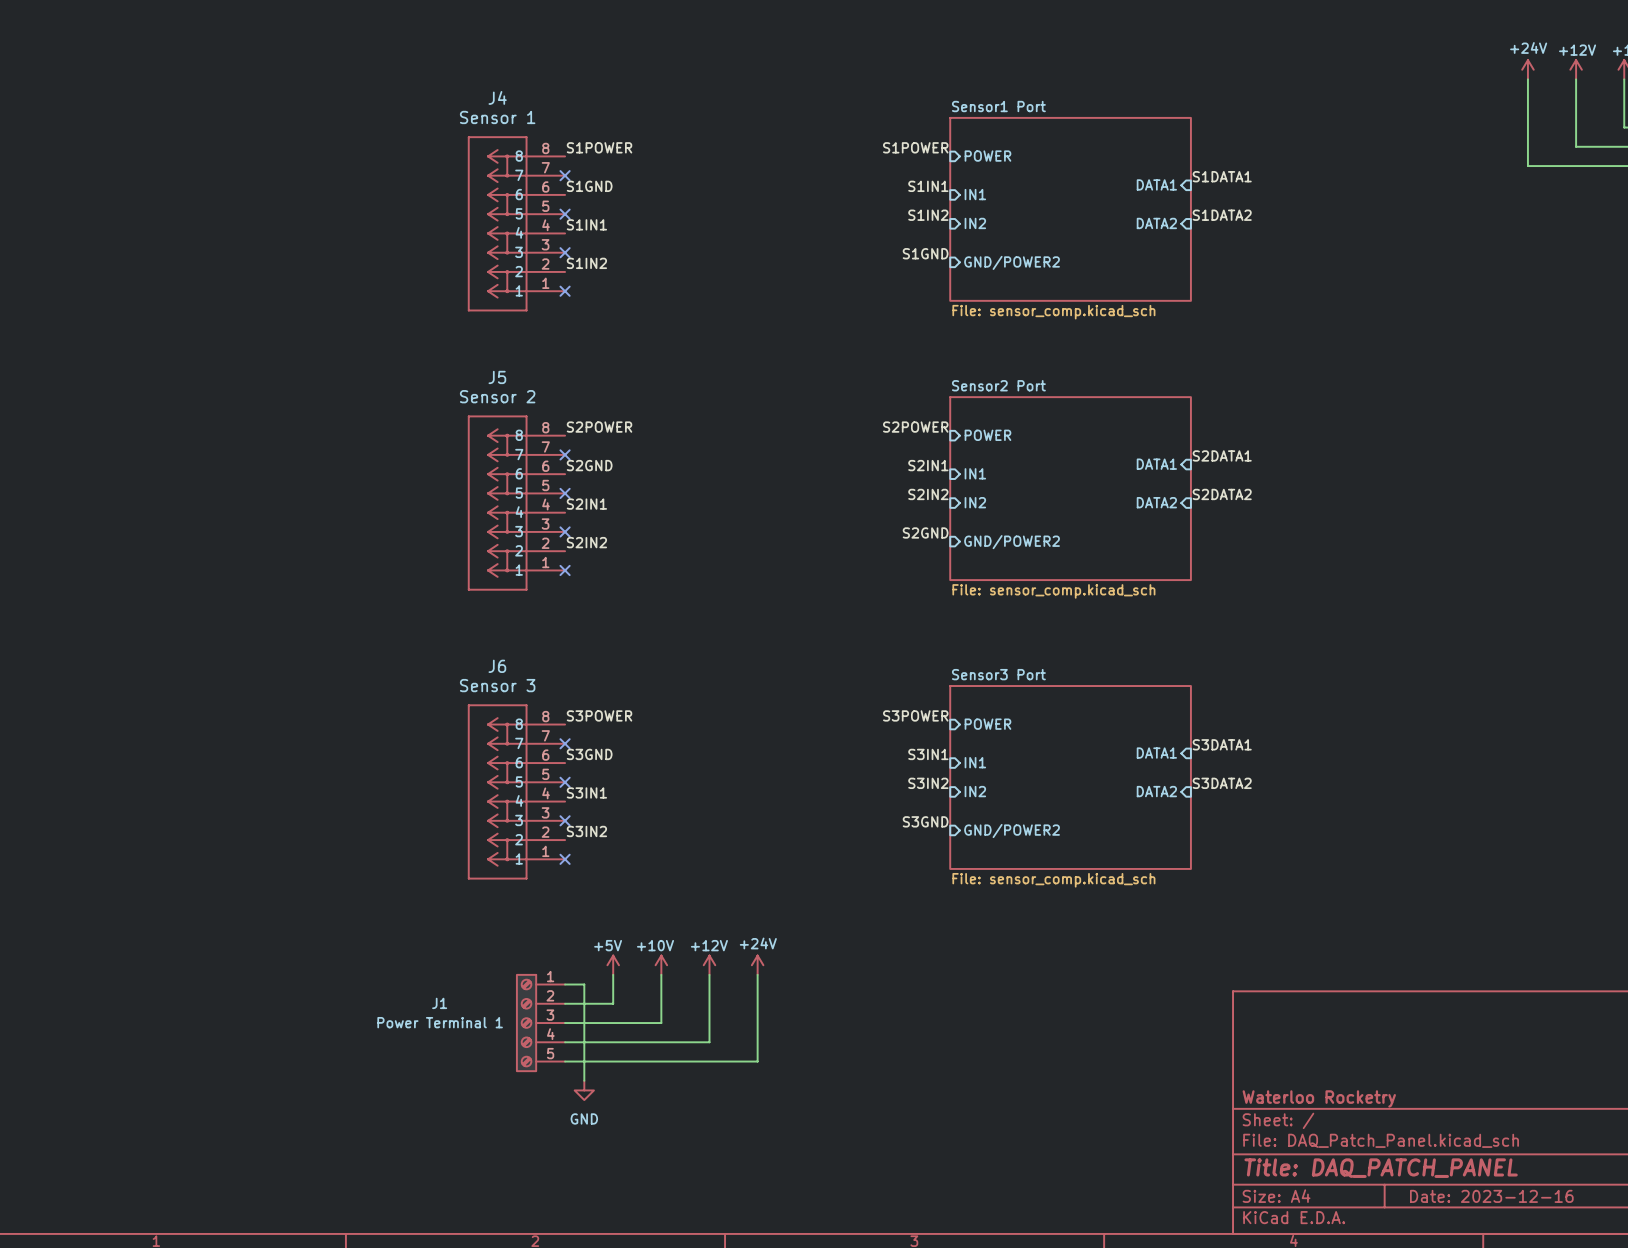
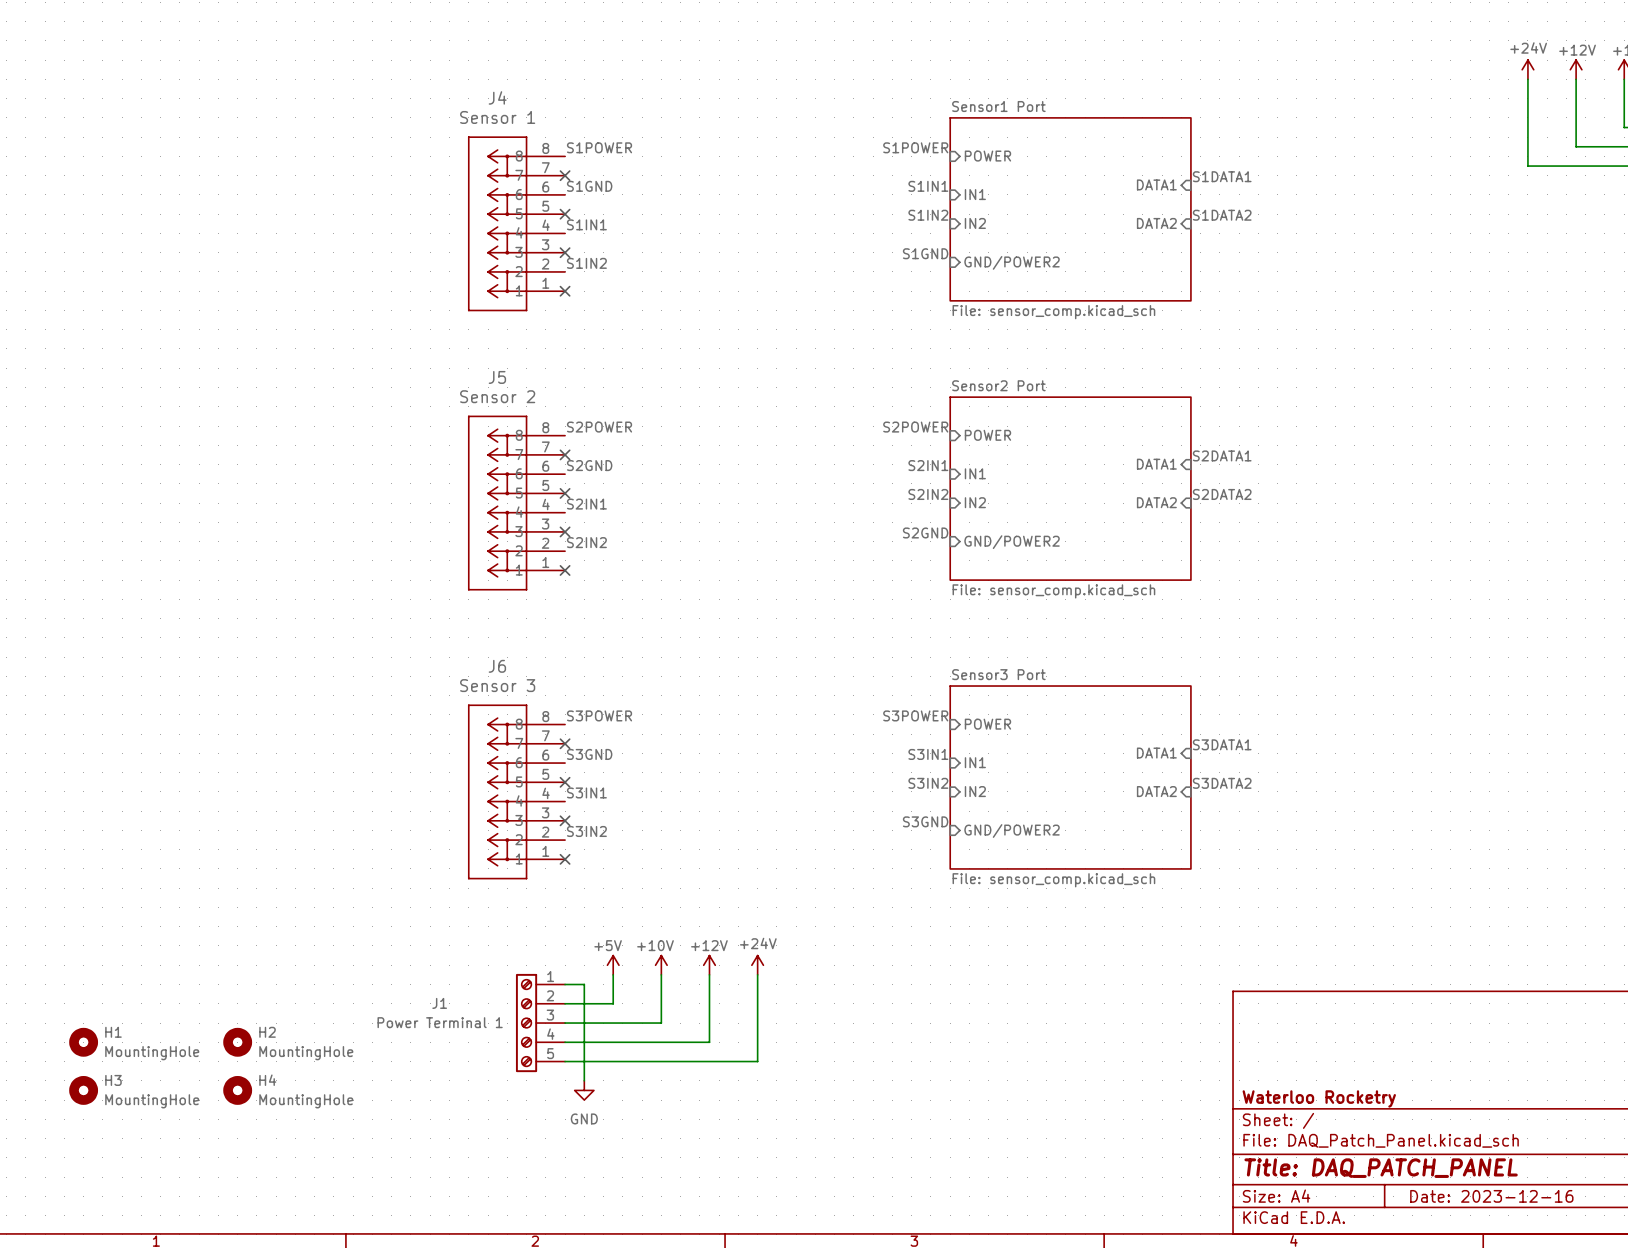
H1: none -> MountingHole (83, 1042)
H2: none -> MountingHole (237, 1042)
H3: none -> MountingHole (83, 1090)
H4: none -> MountingHole (237, 1090)

